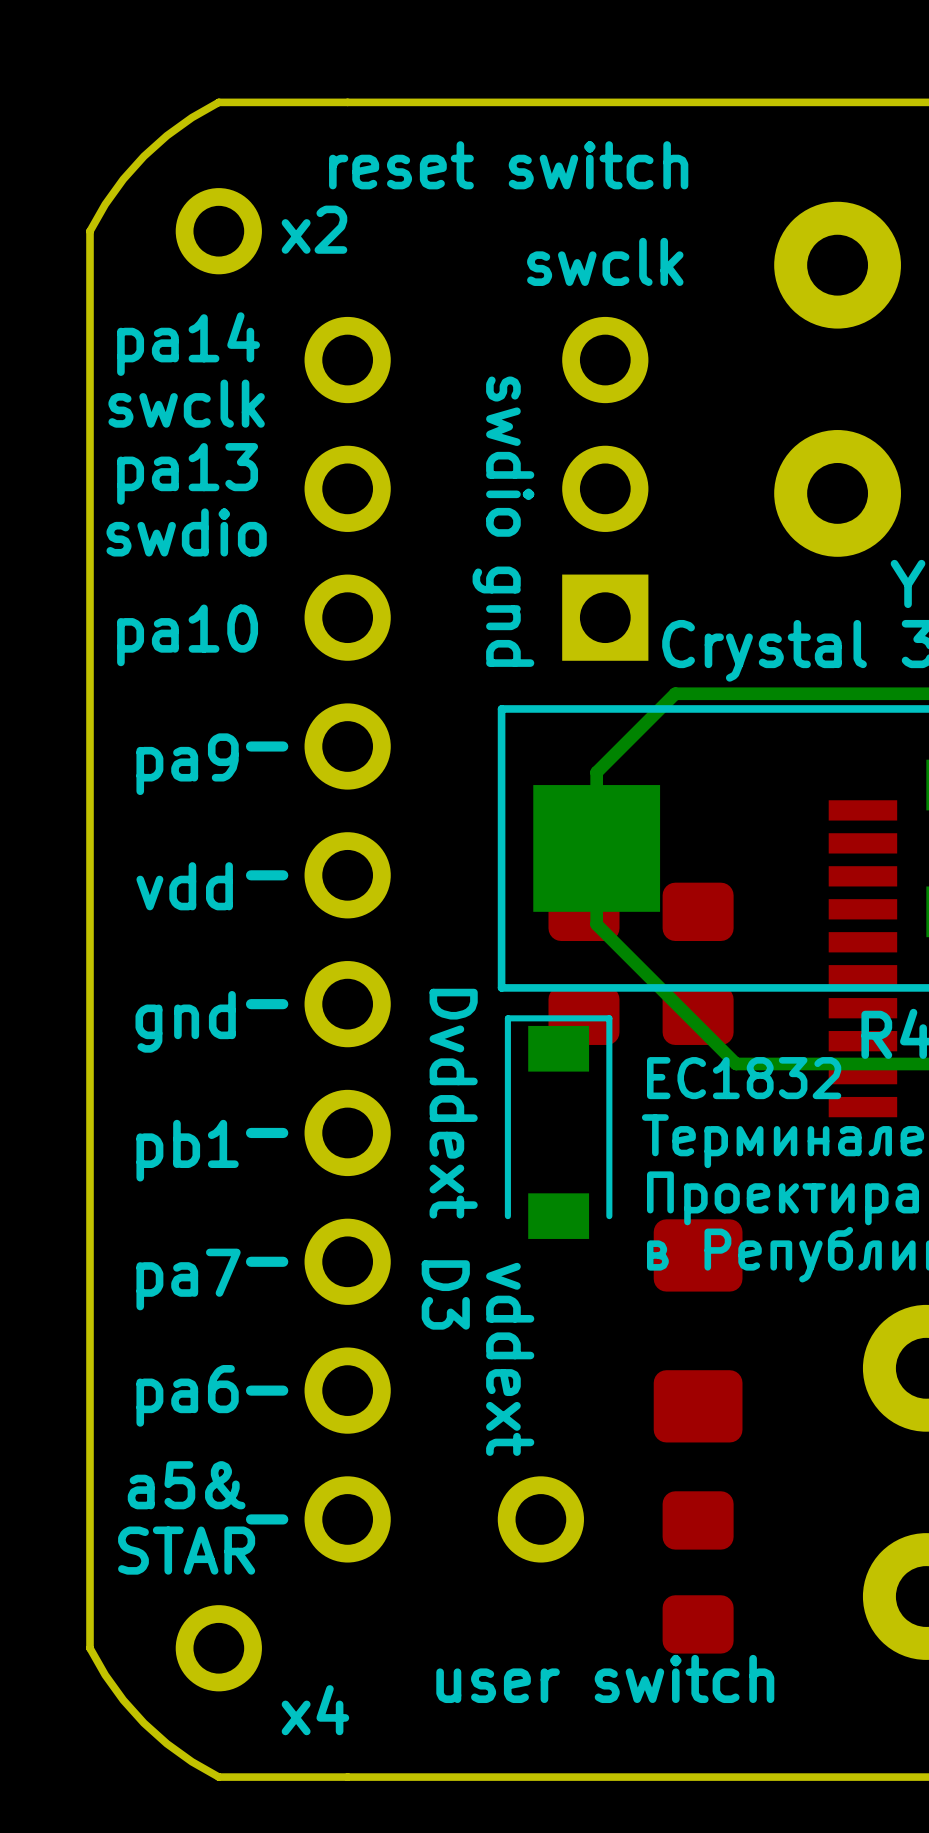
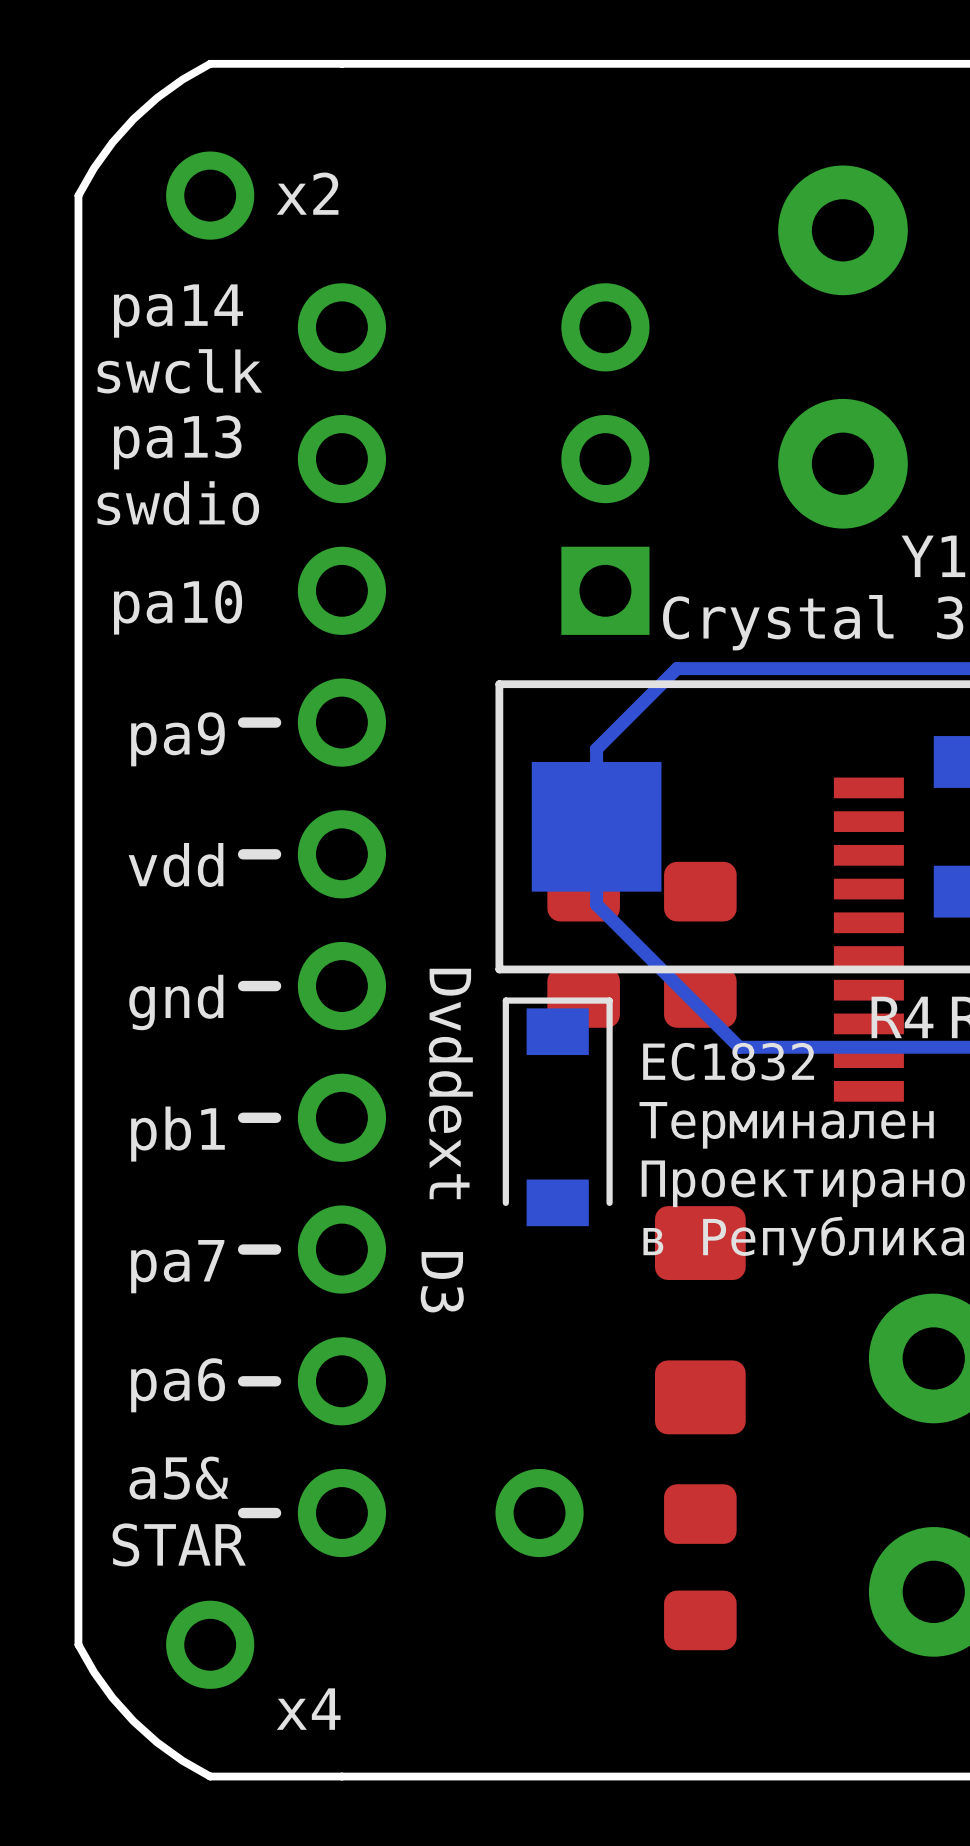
drawing: [329, 141, 689, 667] -> none
drawing: [486, 1262, 535, 1456] -> none
drawing: [436, 1654, 775, 1704] -> none

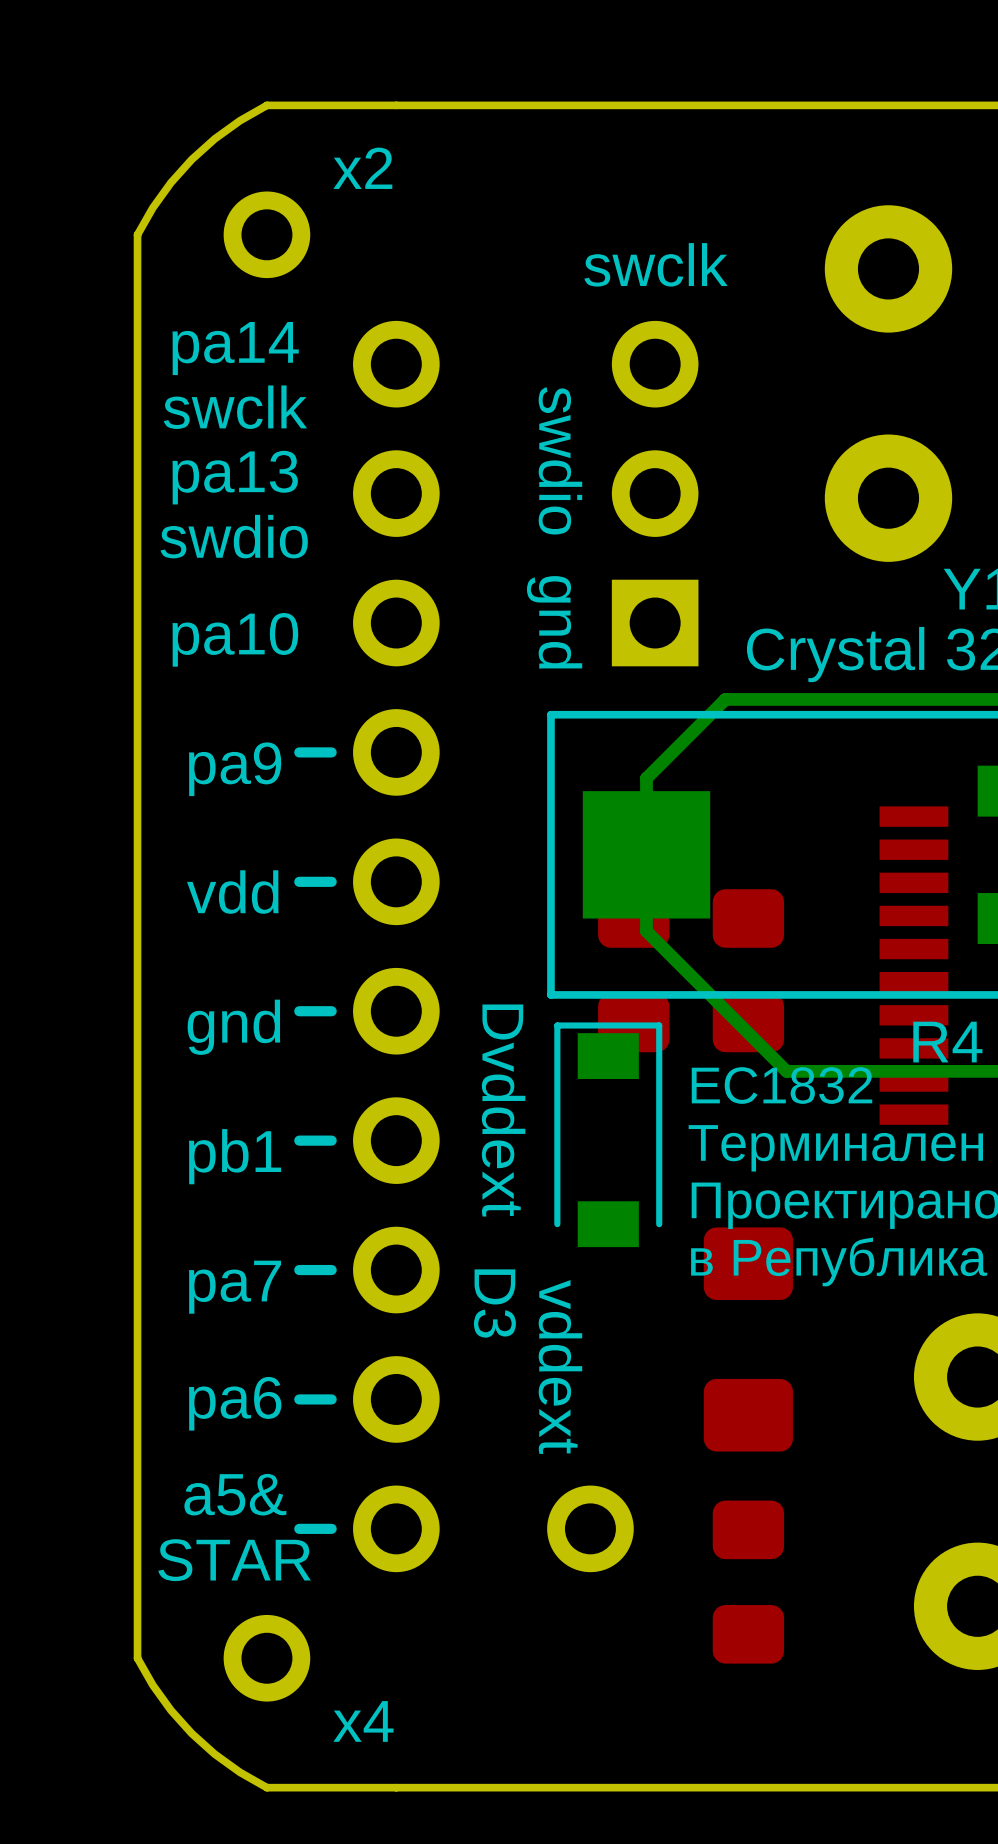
text position: x2 (307, 193) -> x2 (362, 168)
drawing: none -> [526, 243, 728, 669]
drawing: none -> [538, 1280, 583, 1454]

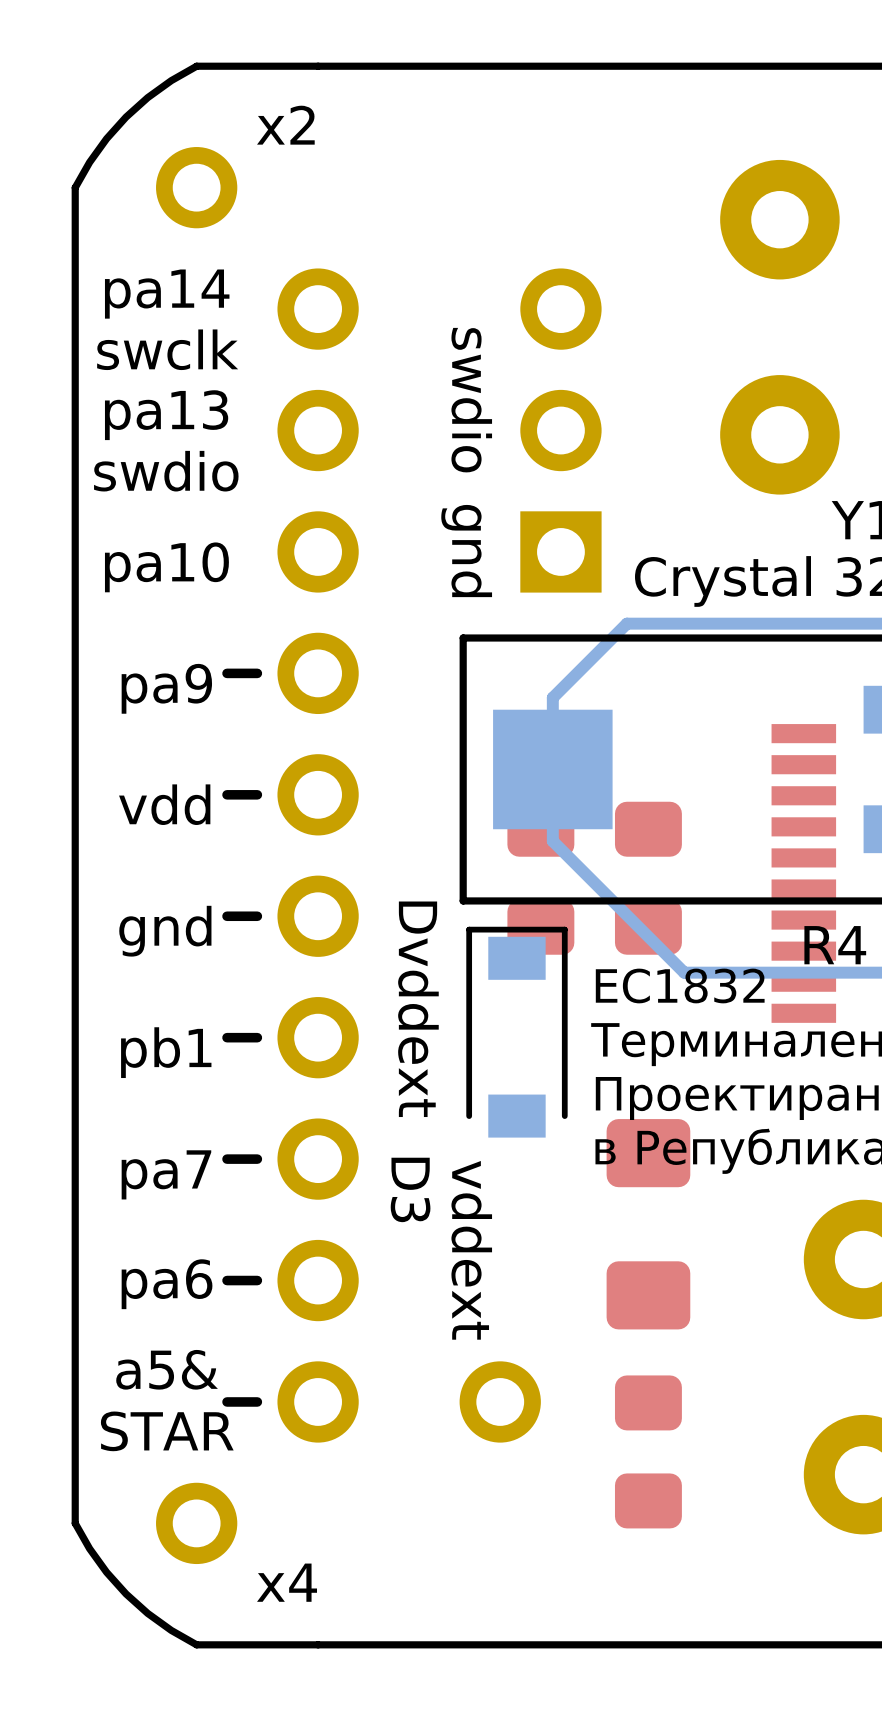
drawing: [526, 243, 728, 669] -> none

